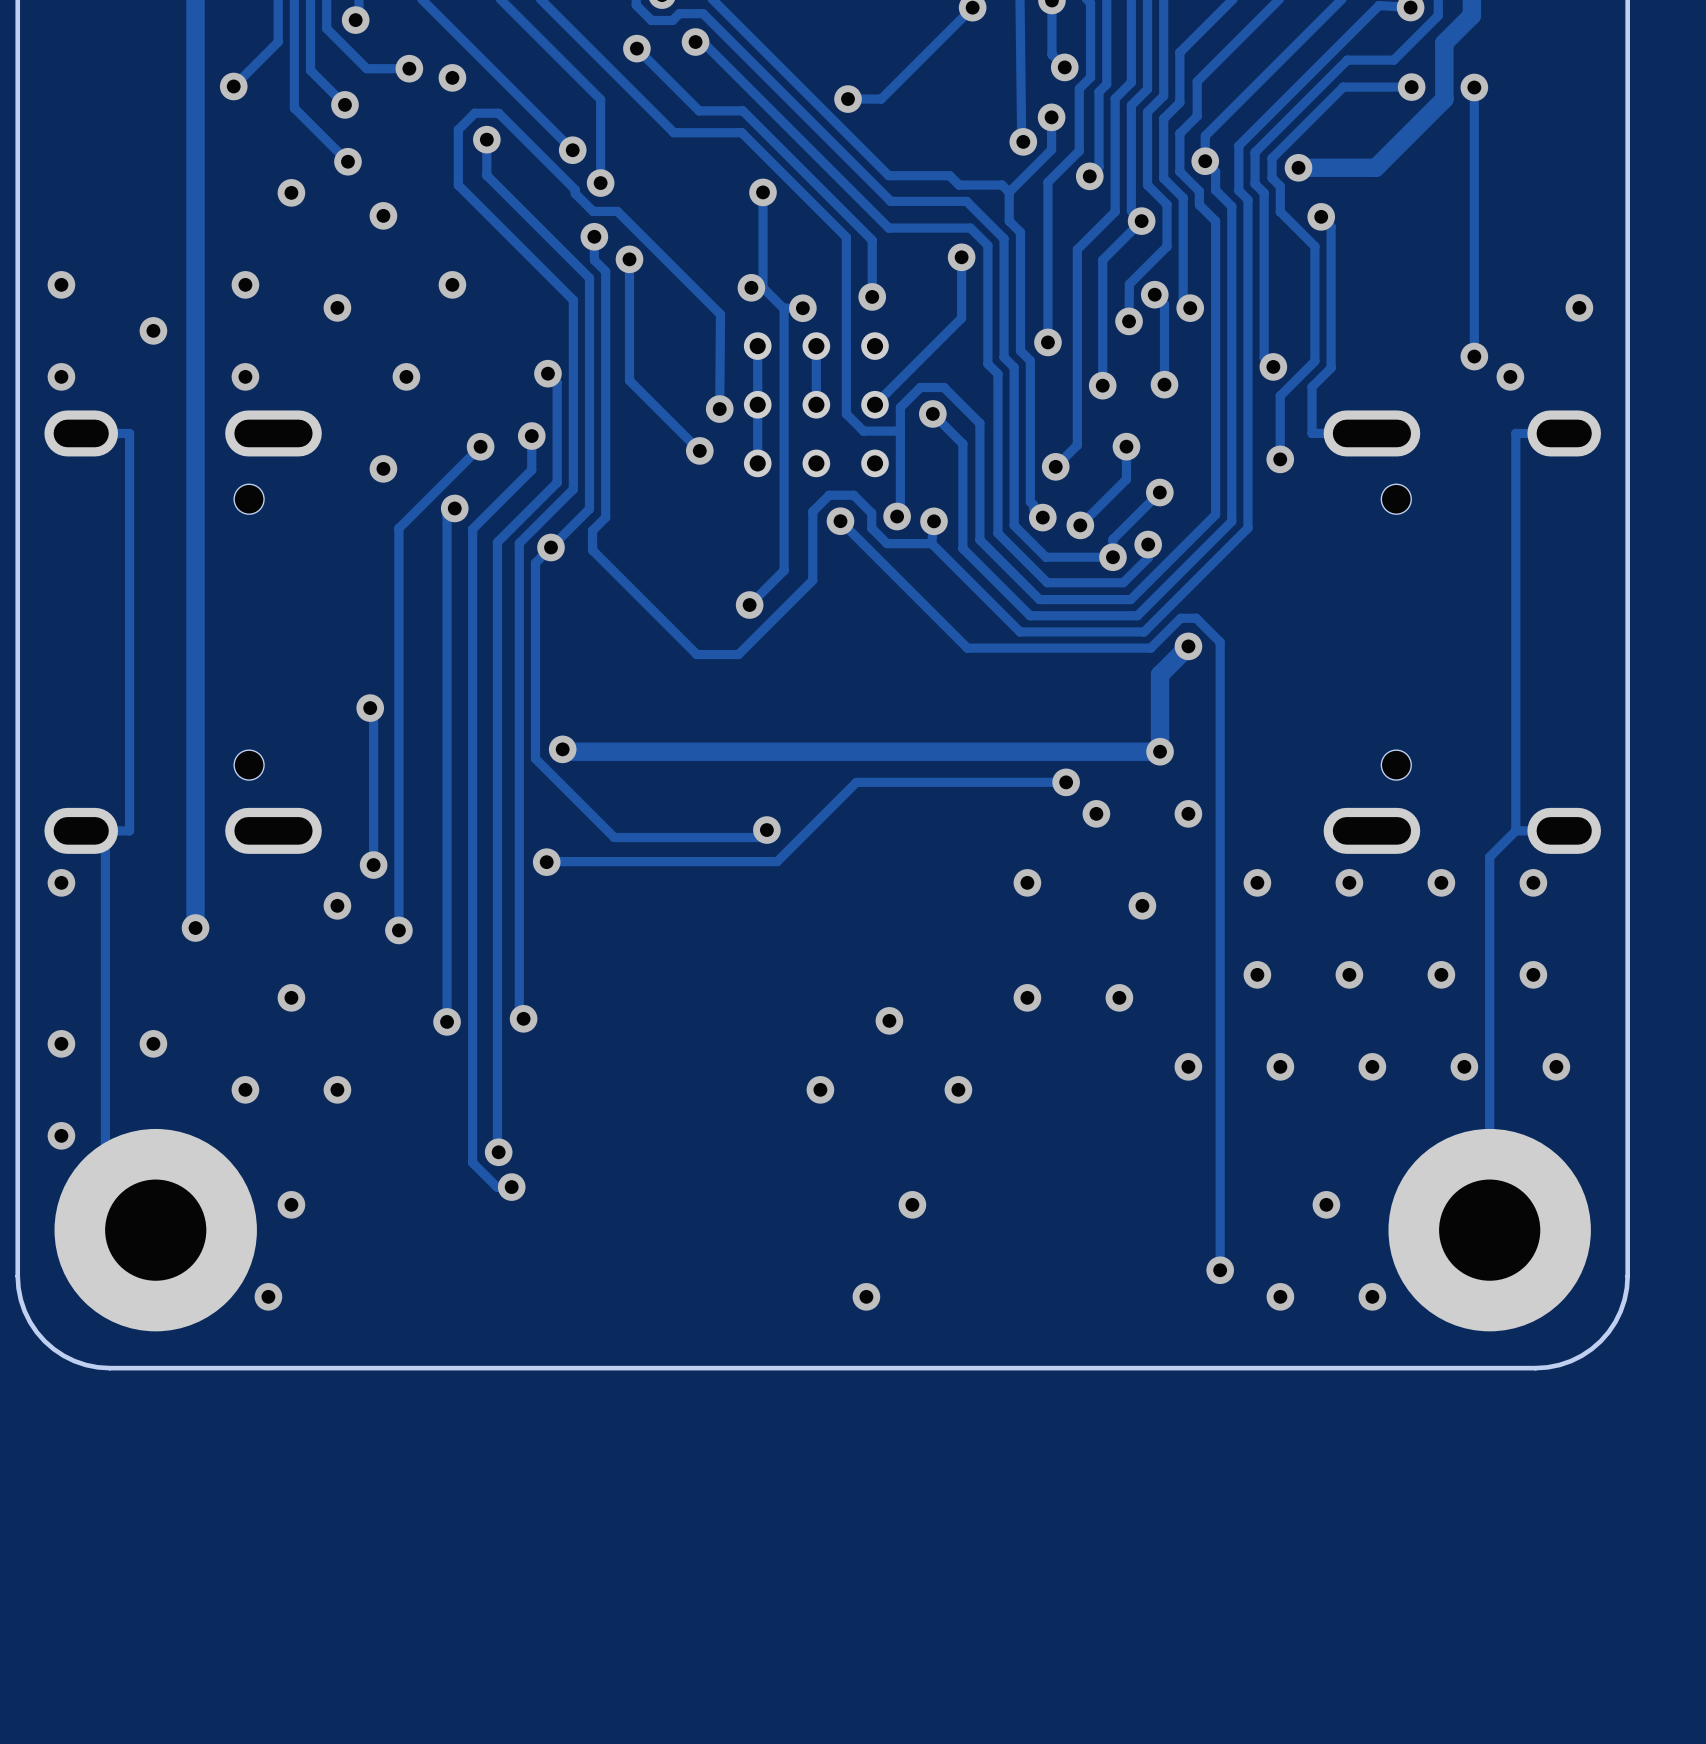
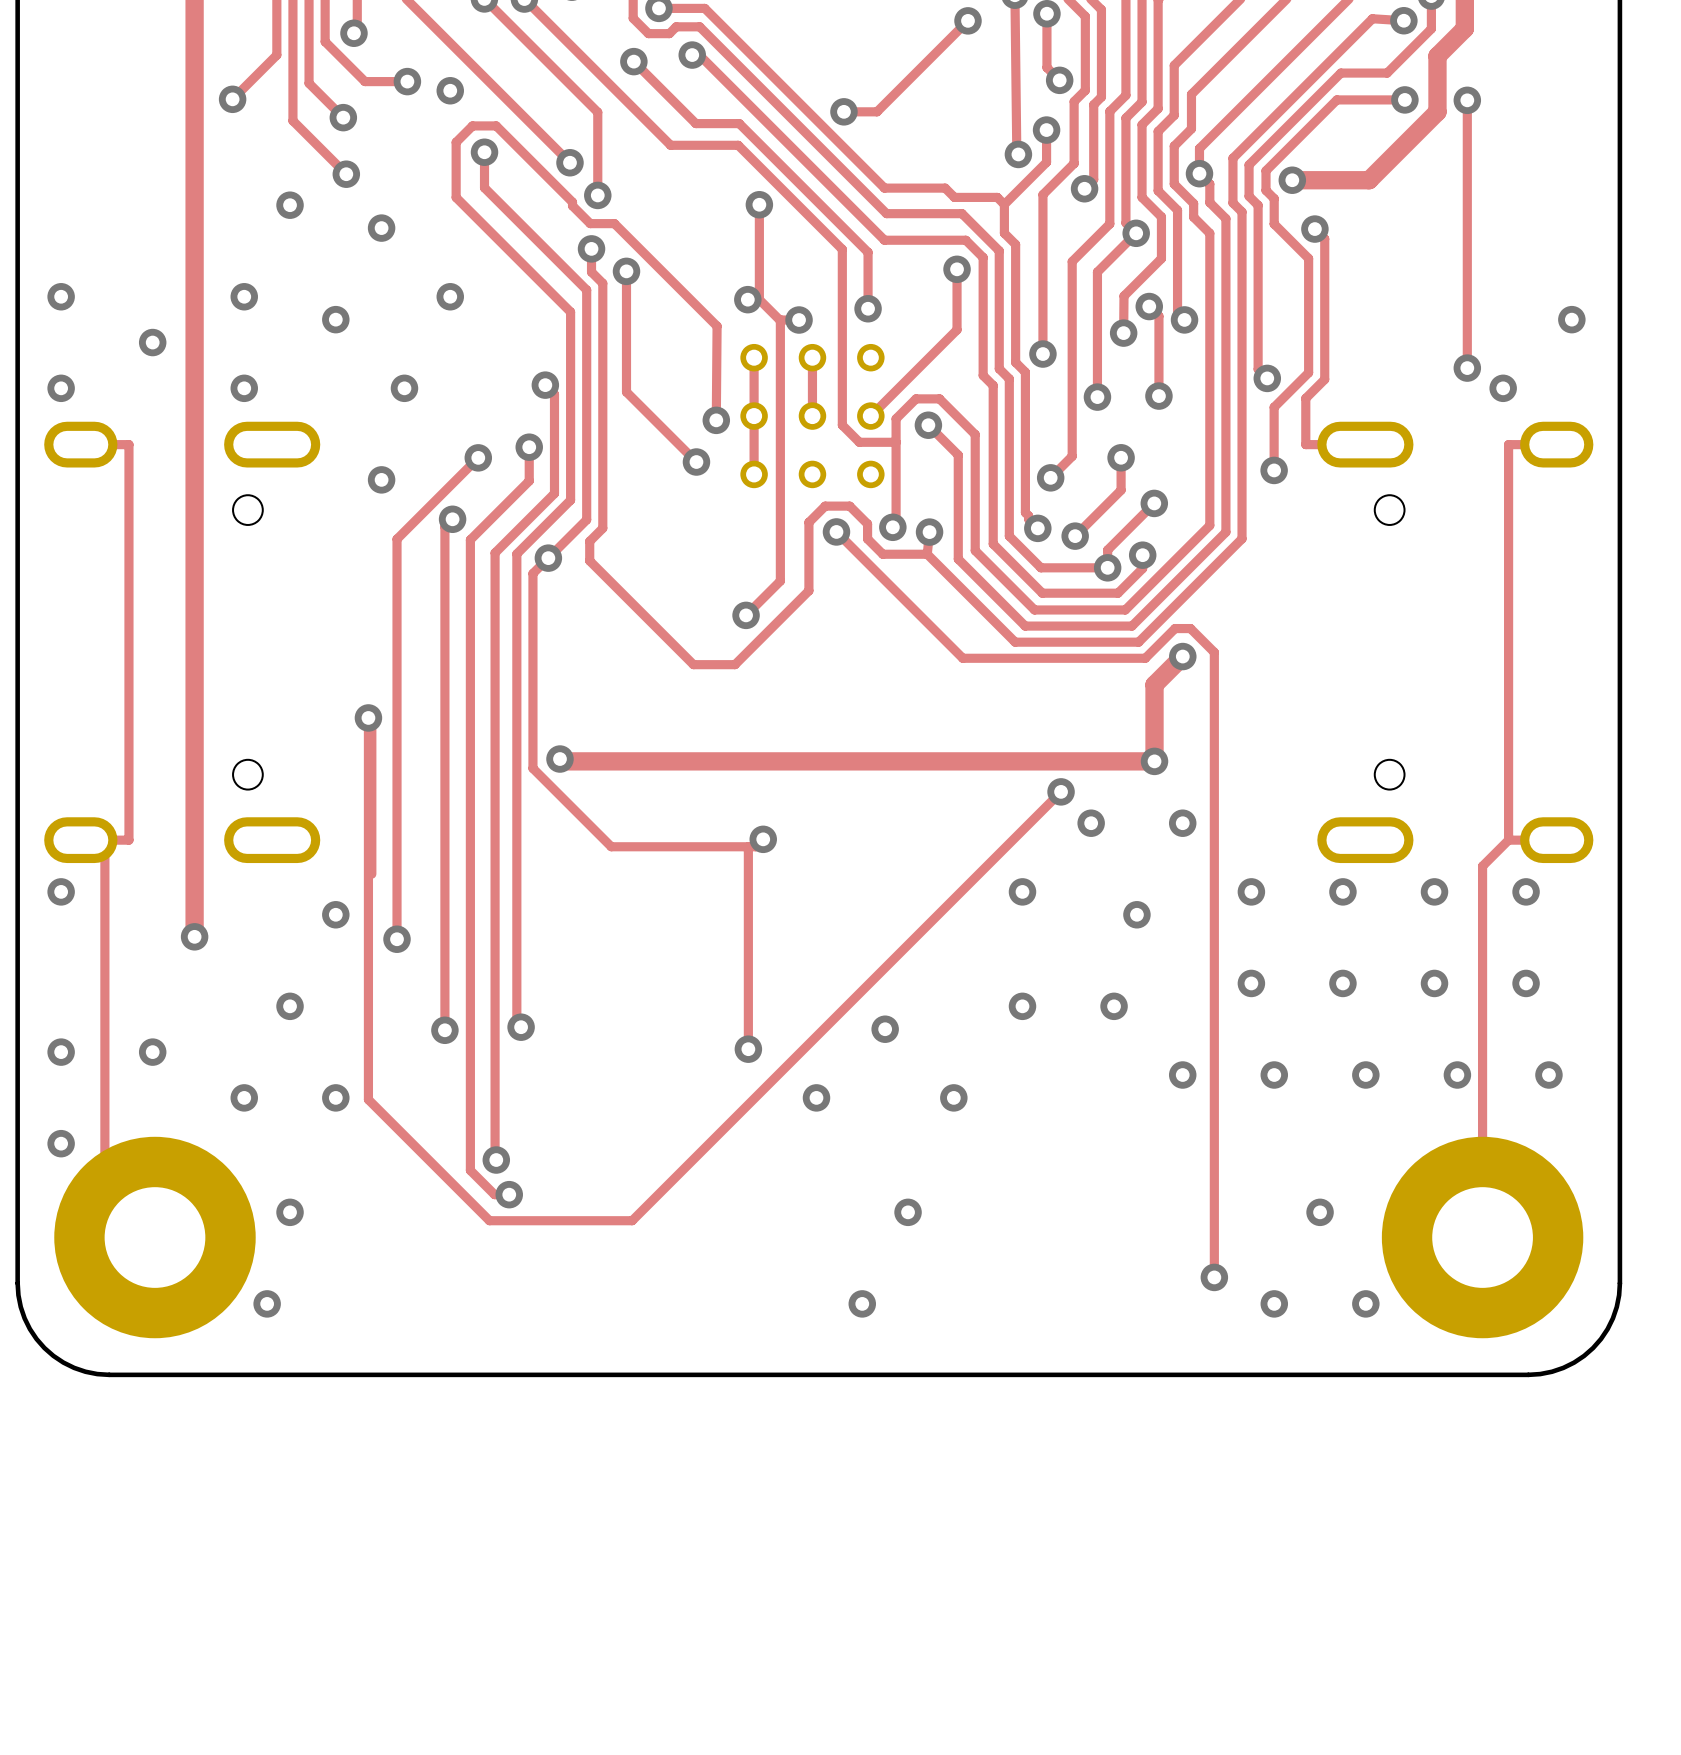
track: (1066, 782) (856, 782) (777, 861) (547, 861) -> (1061, 791) (632, 1220) (489, 1220) (368, 1099) (368, 717)
track: none -> (748, 846) (748, 1049)
via: (546, 862) -> none
via: (373, 865) -> none
via: none -> (748, 1049)

